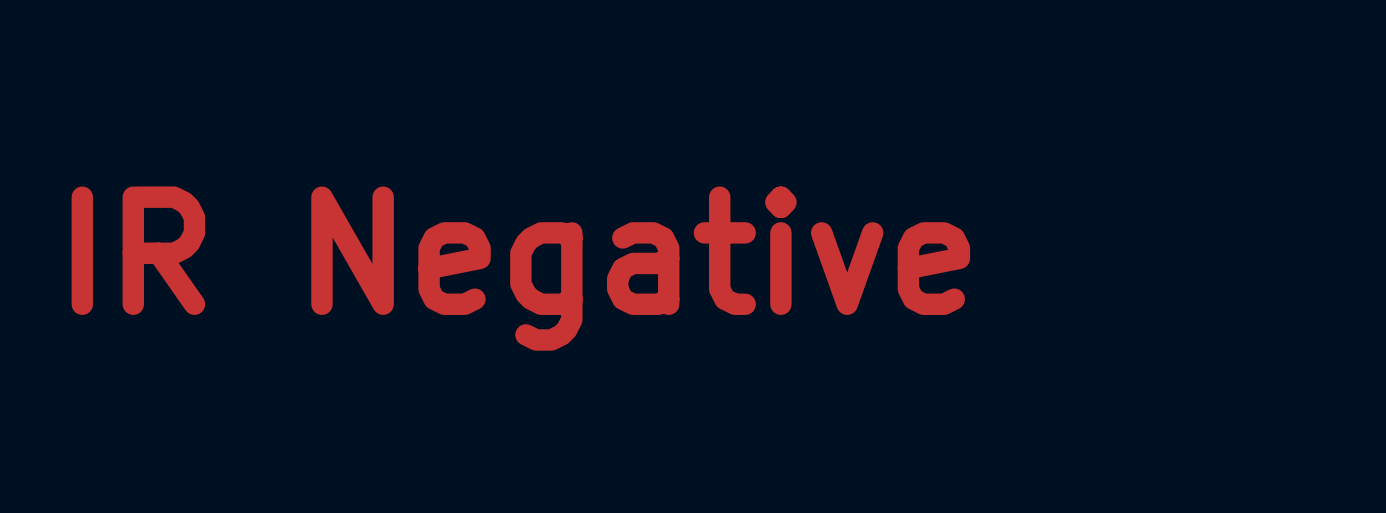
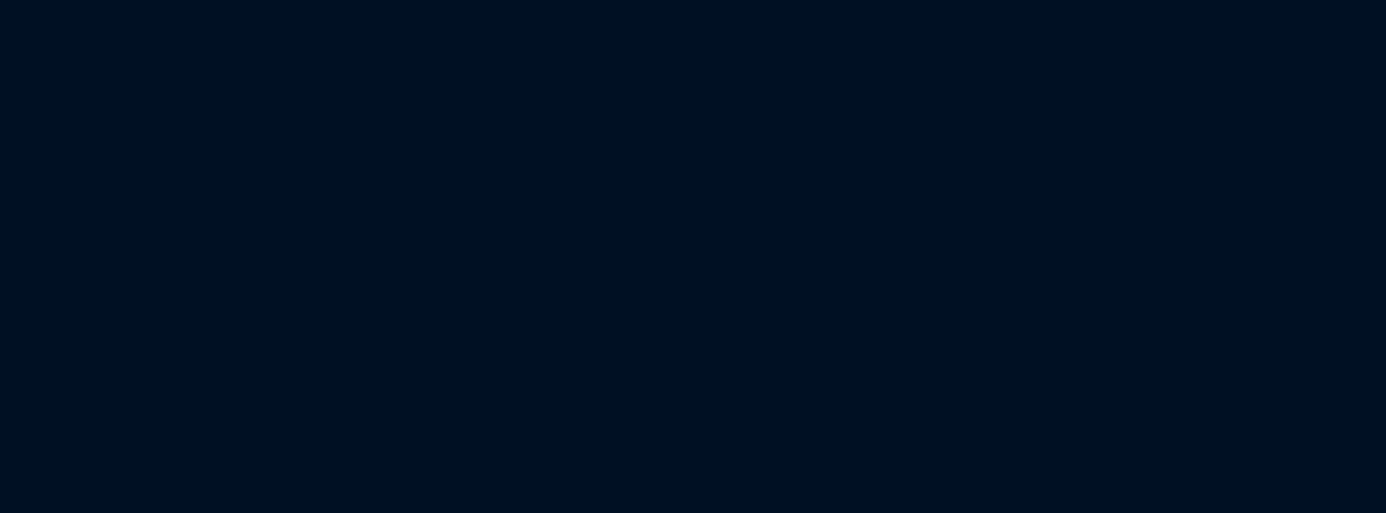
text: IR Negative (520, 268) -> none

